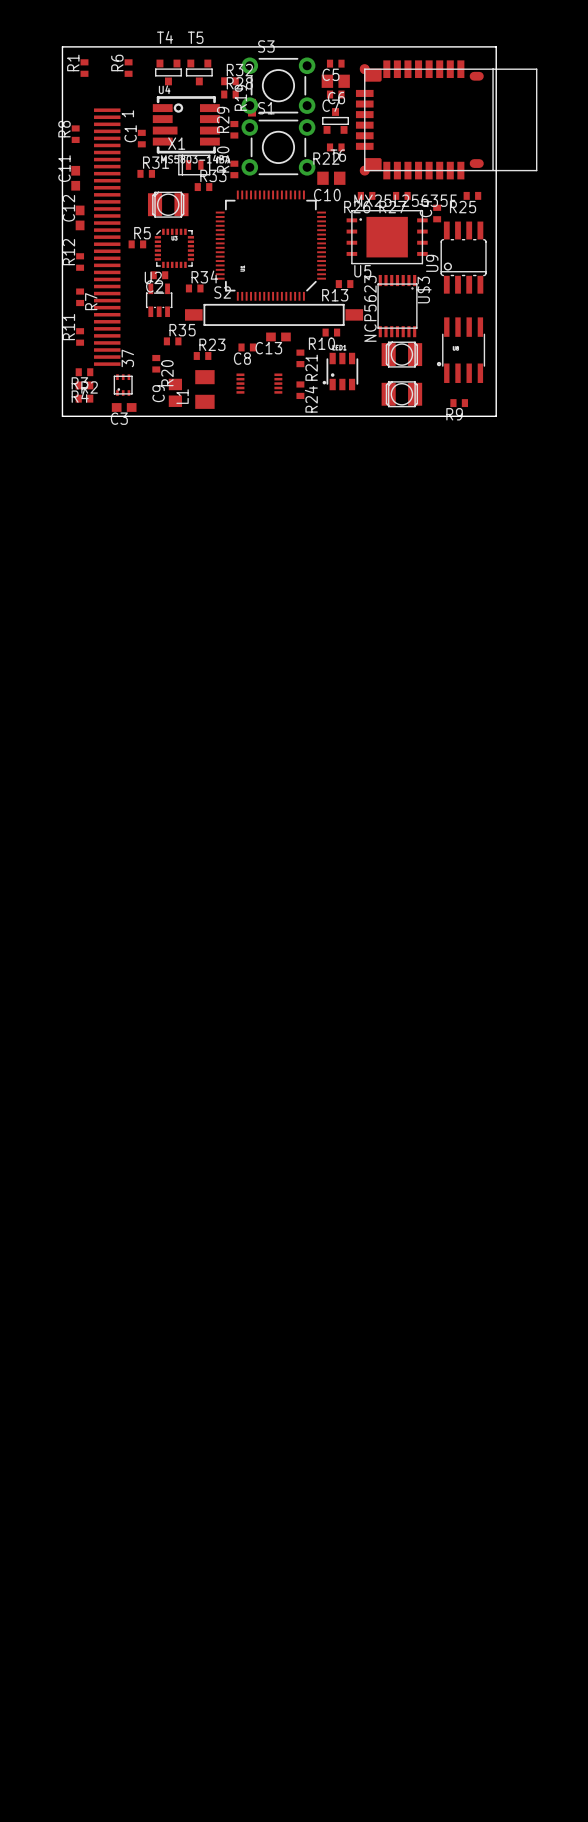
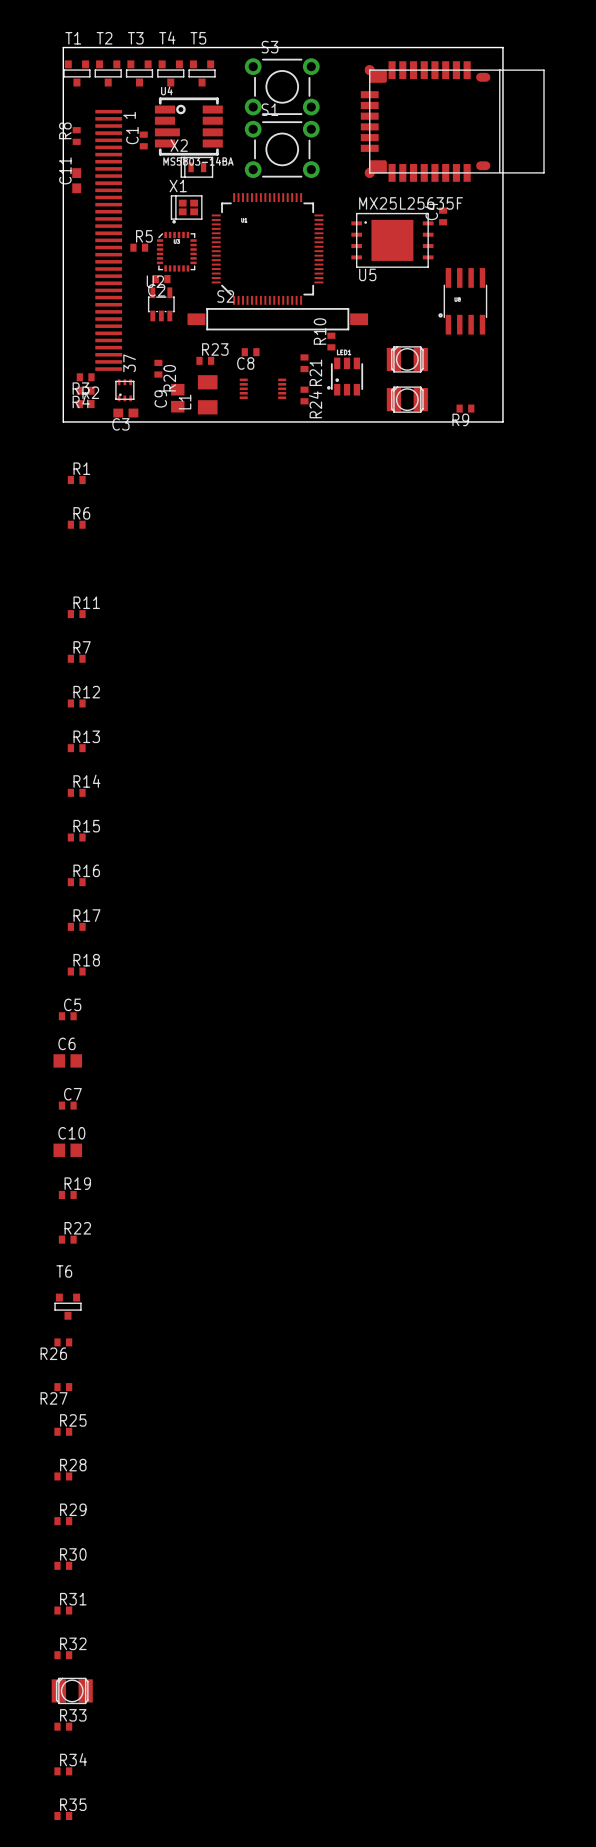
C5 position: (335, 63) -> (67, 1016)
R1 rotation: 0° (84, 68) -> 90° clockwise (76, 480)
R1 position: (84, 68) -> (76, 480)
R6 rotation: 0° (128, 68) -> 90° clockwise (76, 524)
R6 position: (128, 68) -> (76, 524)
T1: none -> (76, 73)
T2: none -> (108, 73)
T3: none -> (139, 73)
C5 name position: C5 (330, 74) -> C5 (72, 1004)
R32 position: (229, 81) -> (63, 1655)
C6 position: (335, 81) -> (67, 1060)
R28 position: (229, 94) -> (63, 1476)
C7 position: (335, 94) -> (67, 1105)
C6 name position: C6 (336, 98) -> C6 (66, 1043)
C7 name position: C7 (331, 105) -> C7 (72, 1094)
R19 rotation: 0° (252, 107) -> 90° clockwise (67, 1194)
R19 position: (252, 107) -> (67, 1194)
T6 rotation: 0° (335, 120) -> 180° (68, 1306)
T6 position: (335, 120) -> (68, 1306)
R29 rotation: 0° (234, 129) -> 90° clockwise (63, 1521)
R29 position: (234, 129) -> (63, 1521)
X1 name: X1 (176, 143) -> X2 (179, 145)
R22 position: (335, 147) -> (67, 1239)
R22 name position: R22 (326, 158) -> R22 (77, 1228)
R30 rotation: 0° (234, 169) -> 90° clockwise (63, 1565)
R30 position: (234, 169) -> (63, 1565)
R31 position: (146, 173) -> (63, 1610)
C10 position: (331, 178) -> (67, 1150)
R33 position: (203, 187) -> (63, 1726)
C10 name position: C10 (327, 195) -> C10 (71, 1133)
R26 position: (366, 195) -> (63, 1342)
R27 position: (401, 195) -> (63, 1387)
R25 position: (472, 195) -> (63, 1431)
part: (168, 204) -> none
X1: none -> (186, 209)
R25 name position: R25 (463, 207) -> R25 (73, 1420)
C12: (80, 217) -> none
part rotation: 0° (270, 245) -> 90° clockwise (267, 248)
U9: (463, 257) -> none
R12 rotation: 0° (80, 262) -> 90° clockwise (76, 703)
R12 position: (80, 262) -> (76, 703)
R13 position: (344, 284) -> (76, 748)
R34 position: (194, 288) -> (63, 1771)
R13 name position: R13 (335, 295) -> R13 (86, 736)
R7 rotation: 0° (80, 297) -> 90° clockwise (76, 658)
R7 position: (80, 297) -> (76, 658)
R7 name position: R7 (91, 301) -> R7 (82, 647)
U$3: NCP5623 (397, 306) -> none
R10 rotation: 0° (331, 332) -> 90° clockwise (331, 341)
R11 rotation: 0° (80, 336) -> 90° clockwise (76, 614)
R11 position: (80, 336) -> (76, 614)
C13: (278, 336) -> none
R35 position: (172, 341) -> (63, 1816)
part position: (461, 350) -> (462, 301)
R14: none -> (76, 792)
R15: none -> (76, 837)
R16: none -> (76, 882)
R17: none -> (76, 926)
R18: none -> (76, 971)
part: none -> (72, 1690)

